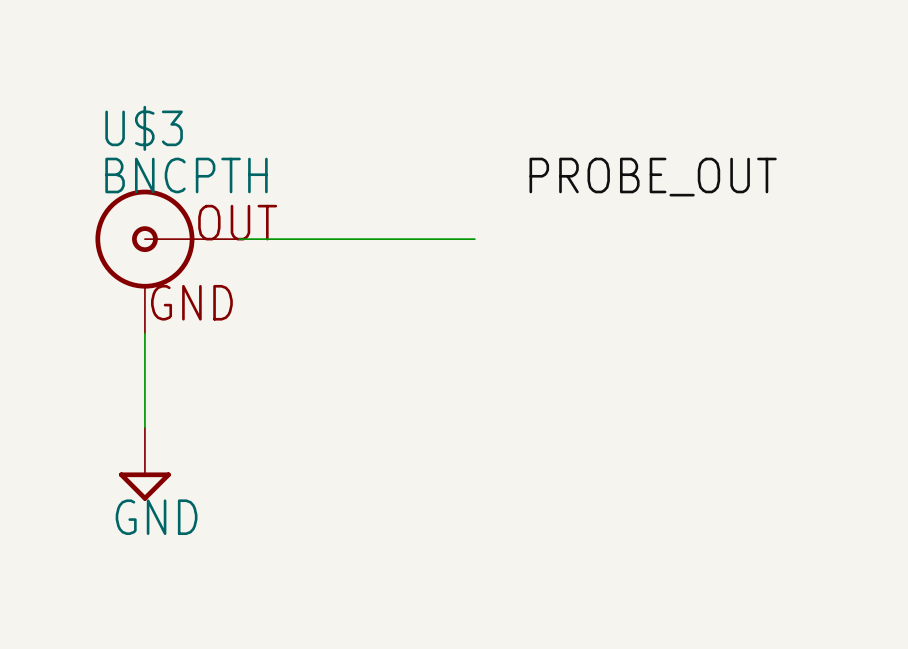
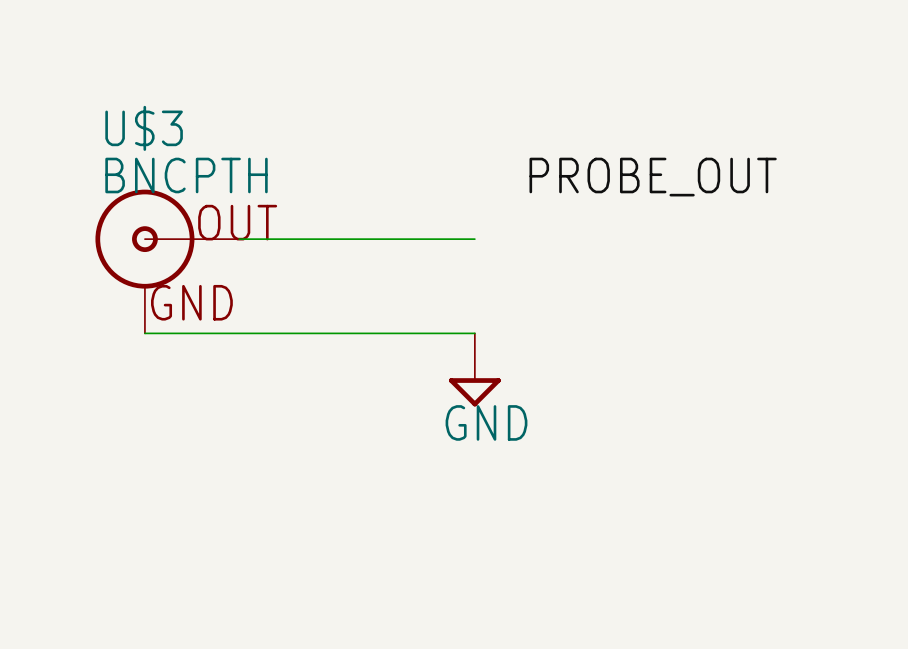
wire: (144, 333) (144, 427) -> (144, 333) (474, 333)
power symbol position: GND (144, 464) -> GND (474, 369)

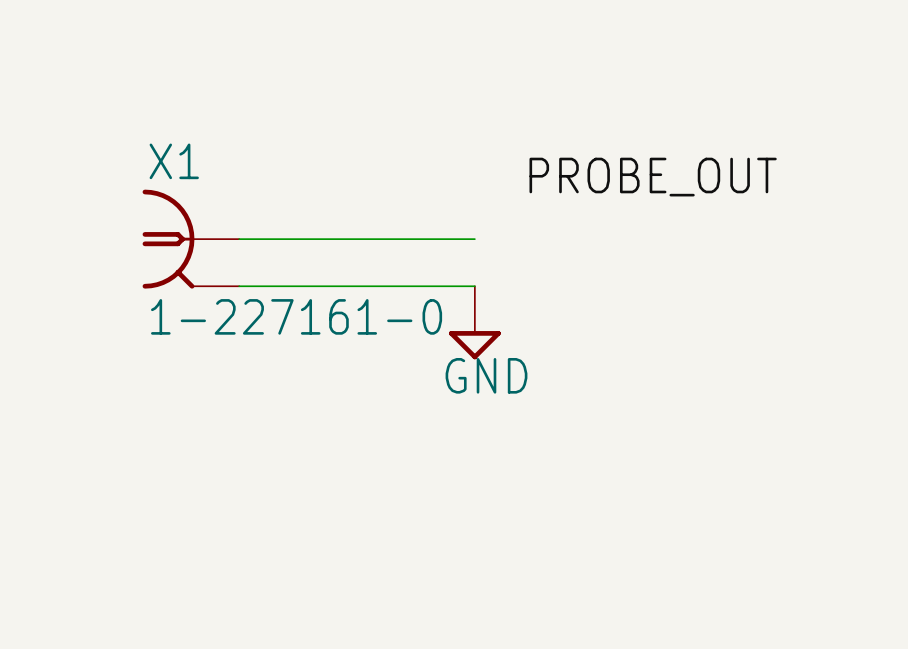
X1: none -> 1-227161-0 (190, 239)
U$3: BNCPTH (167, 261) -> none
wire: none -> (239, 286) (474, 286)
wire: (144, 333) (474, 333) -> none
power symbol position: GND (474, 369) -> GND (474, 322)

